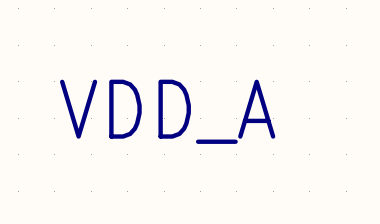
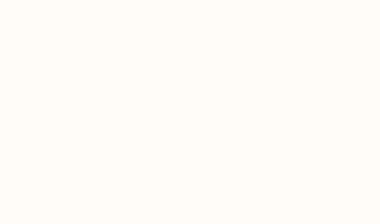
text: VDD_A (167, 111) -> none

